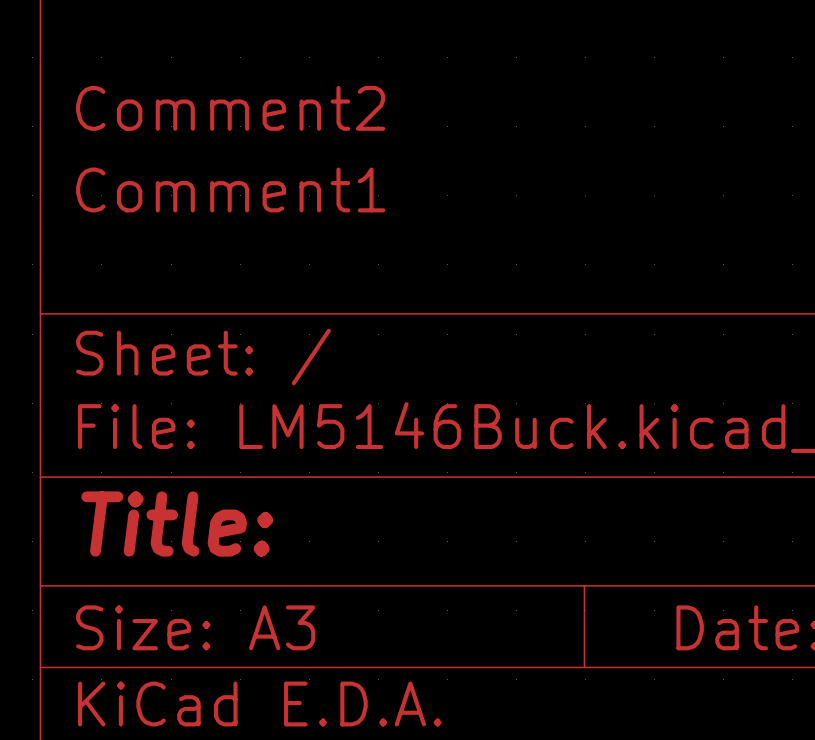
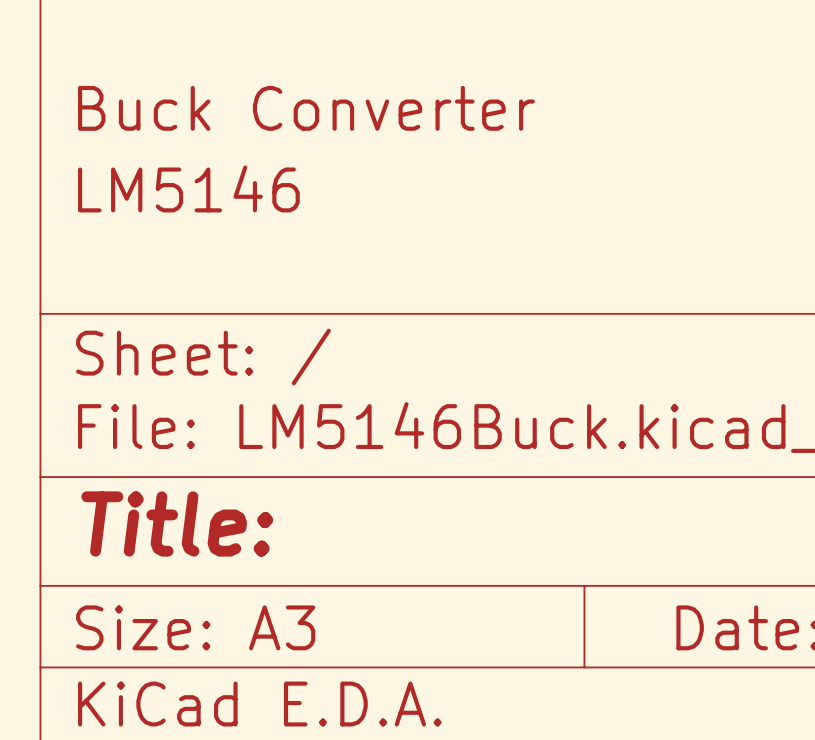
title block: Comment2 (230, 108) -> Buck Converter (306, 108)
title block: Comment1 (230, 189) -> LM5146 (188, 188)

